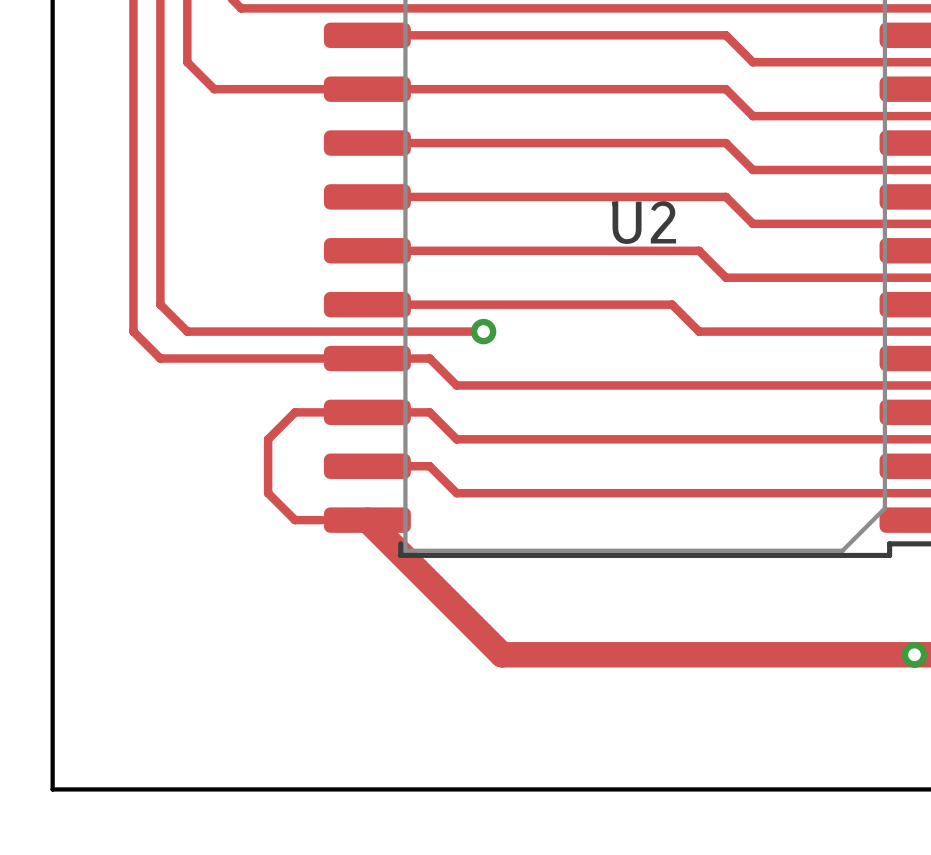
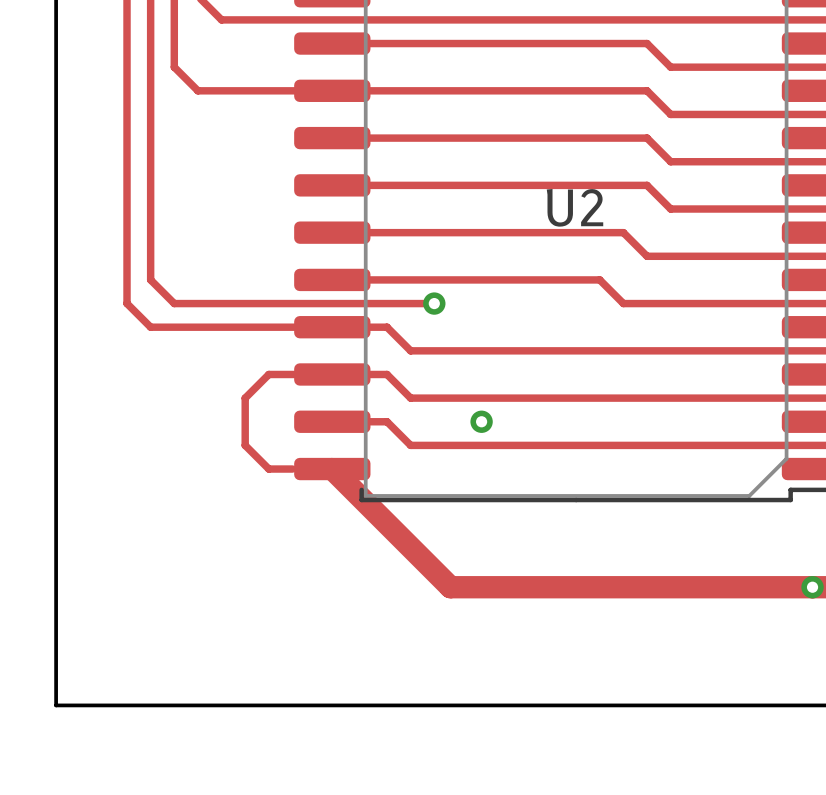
via: none -> (481, 421)

